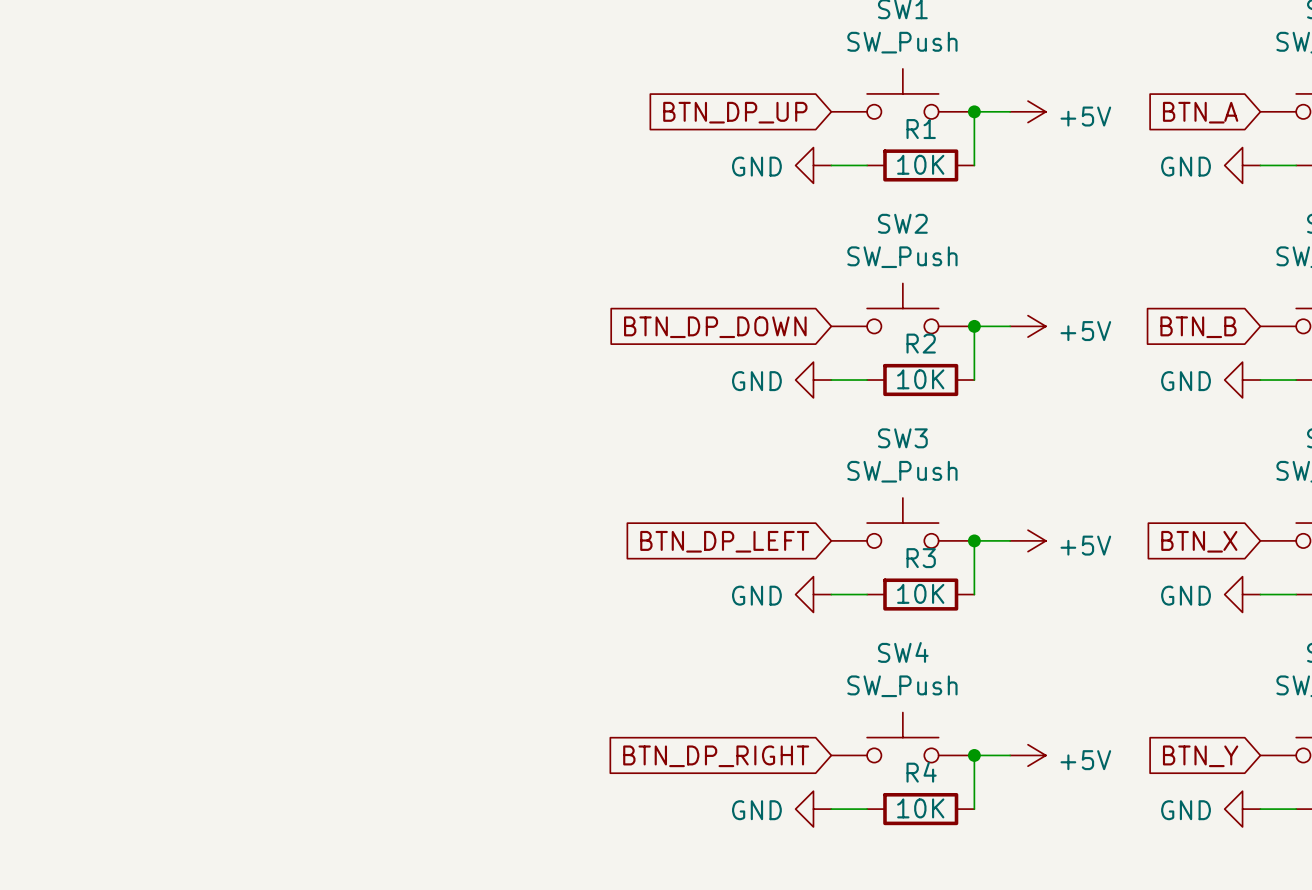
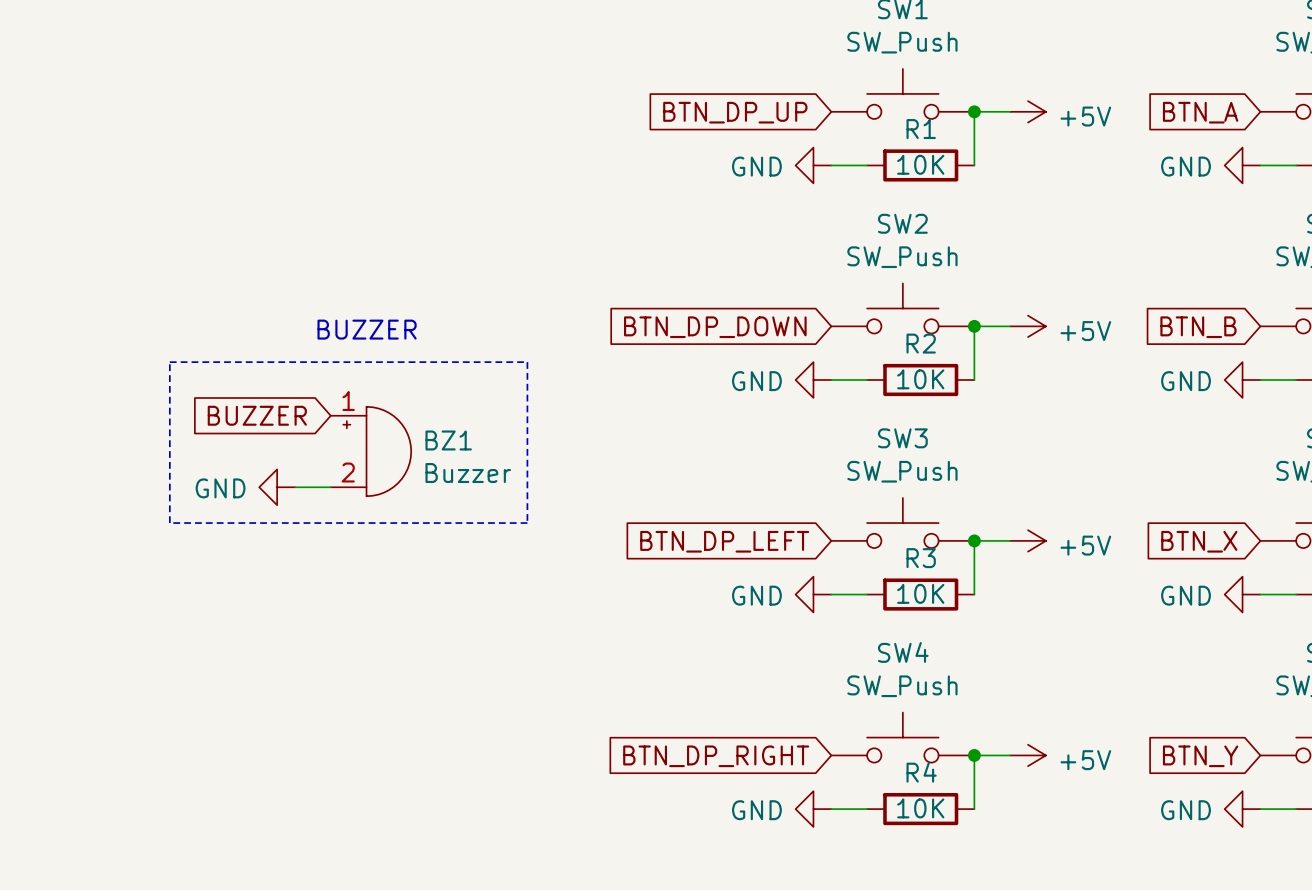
text: none -> BUZZER (367, 329)
line: none -> (169, 362) (169, 523) (527, 523) (527, 362) (169, 362)
global label: none -> BUZZER (257, 415)
BZ1: none -> Buzzer (370, 451)
power symbol: none -> GND (277, 487)
wire: none -> (295, 487) (330, 487)

